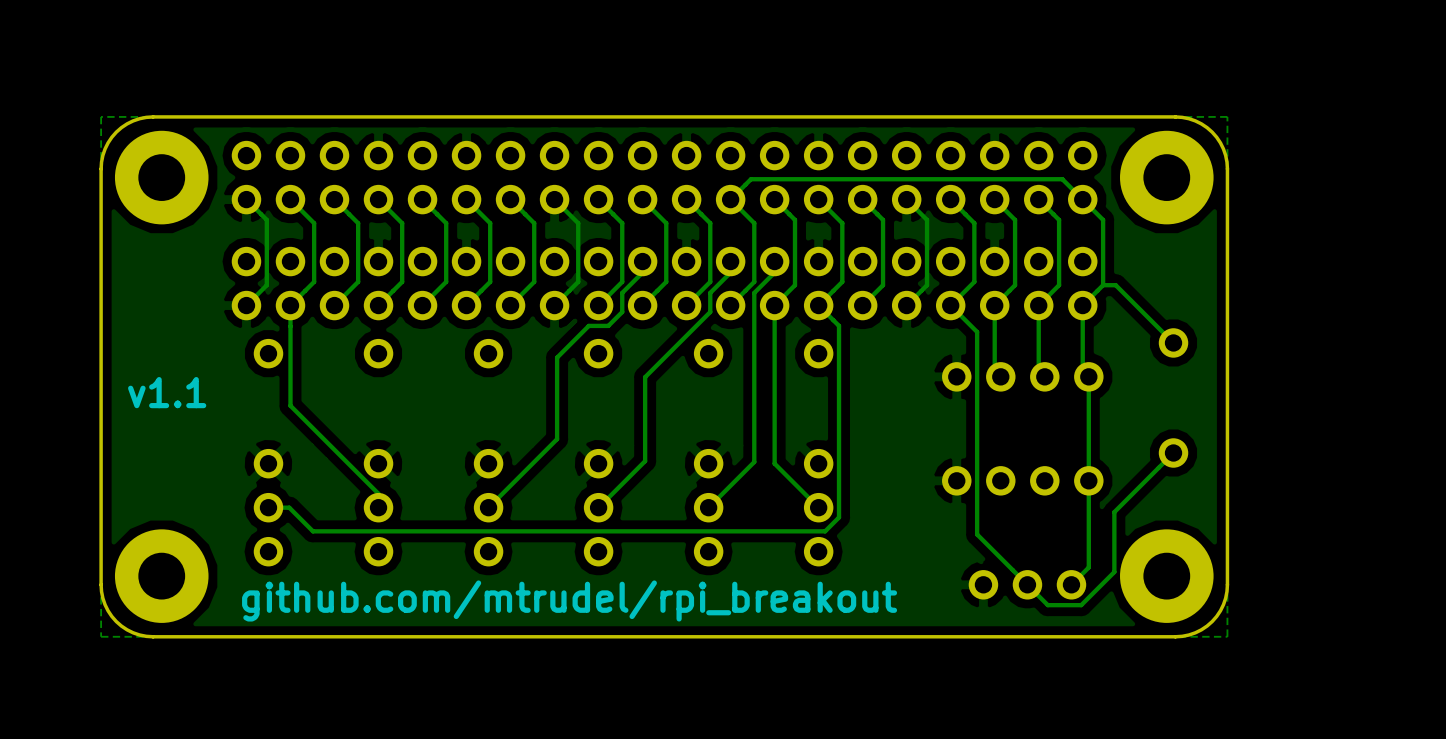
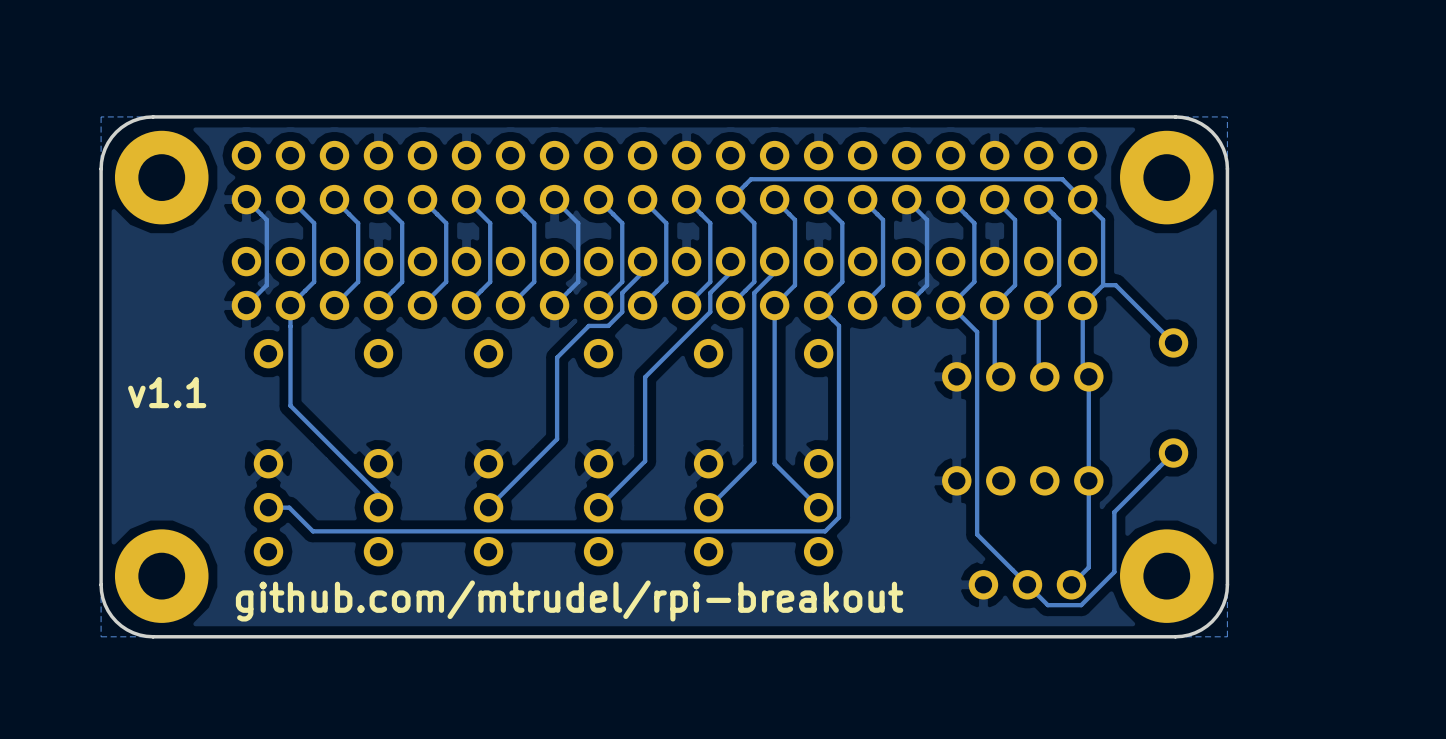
text: github.com/mtrudel/rpi_breakout (569, 600) -> github.com/mtrudel/rpi-breakout (569, 600)

